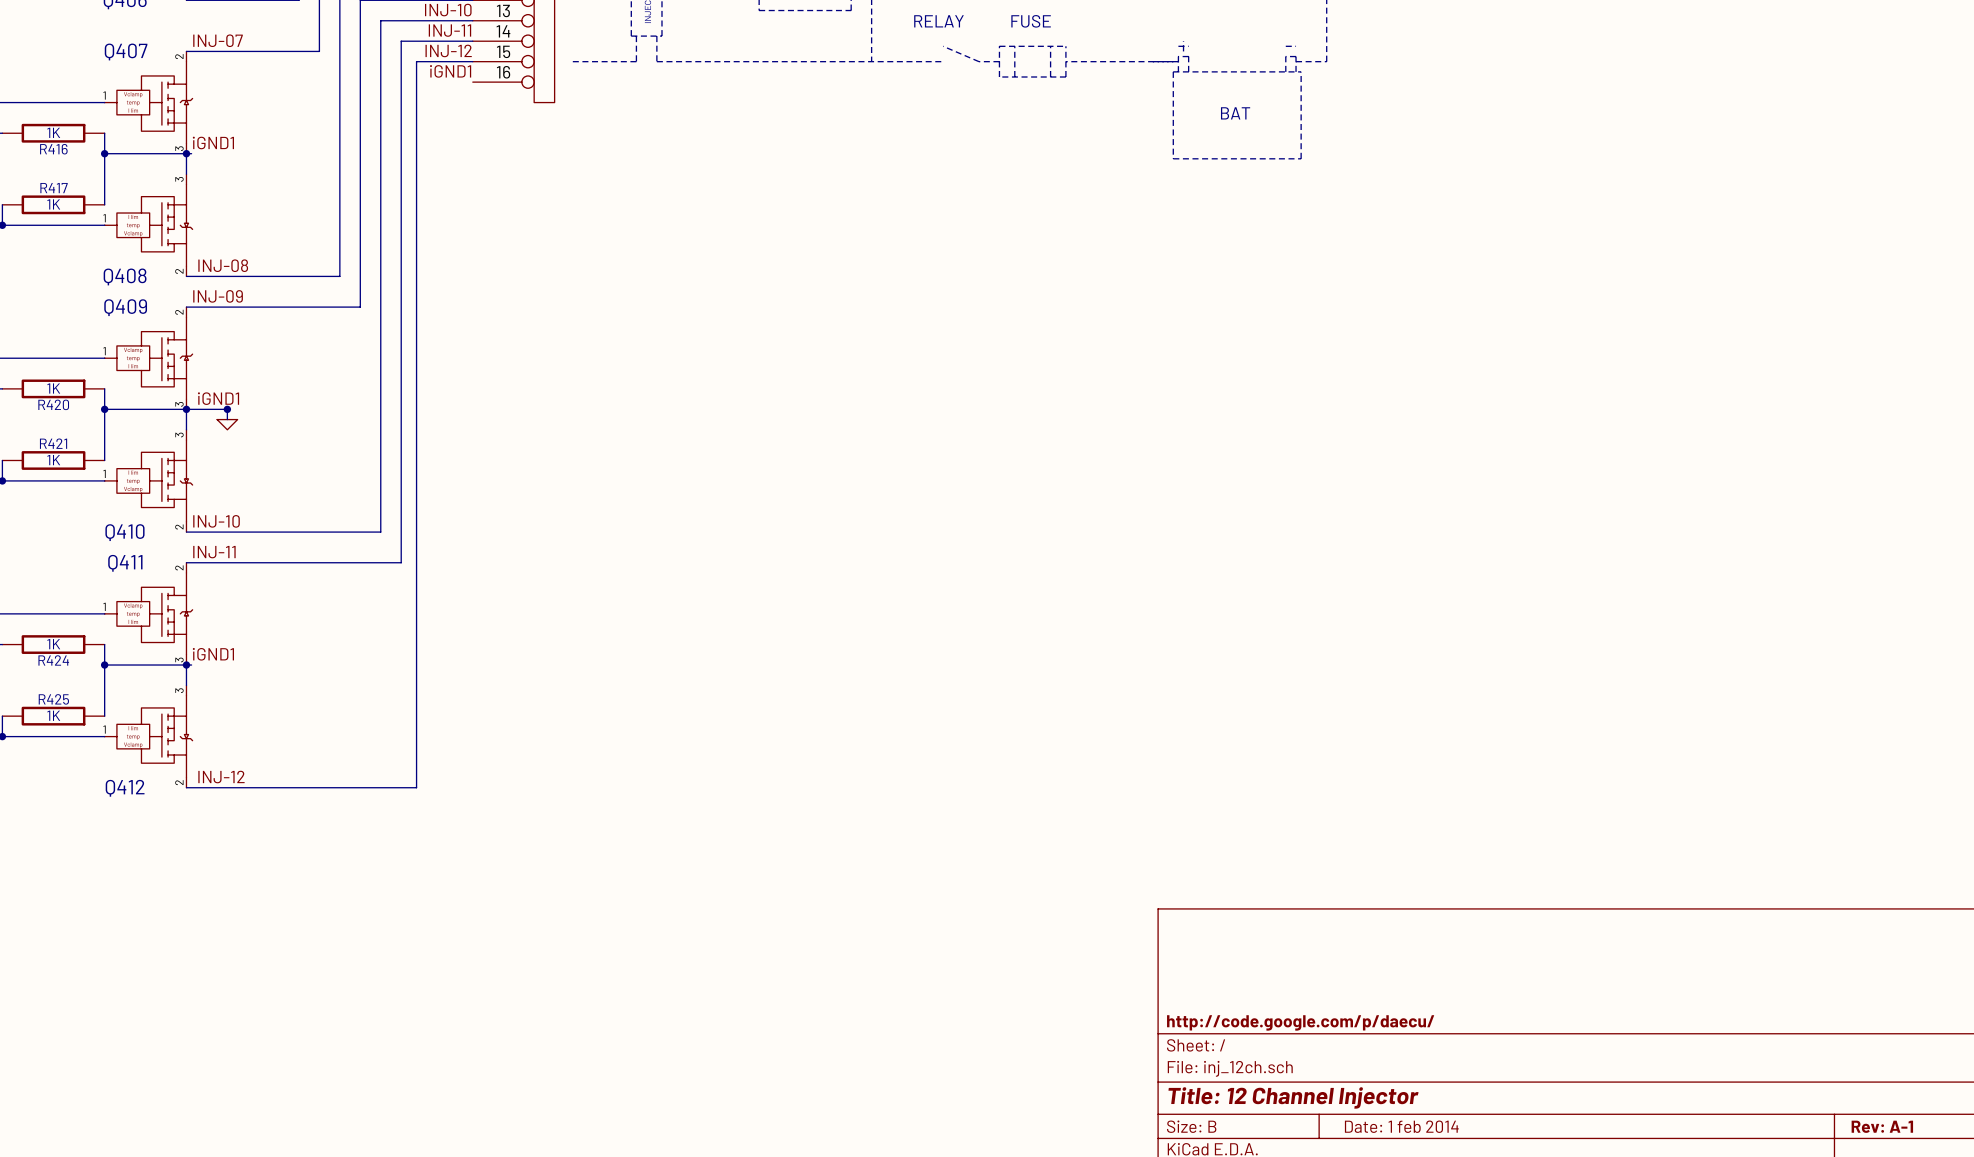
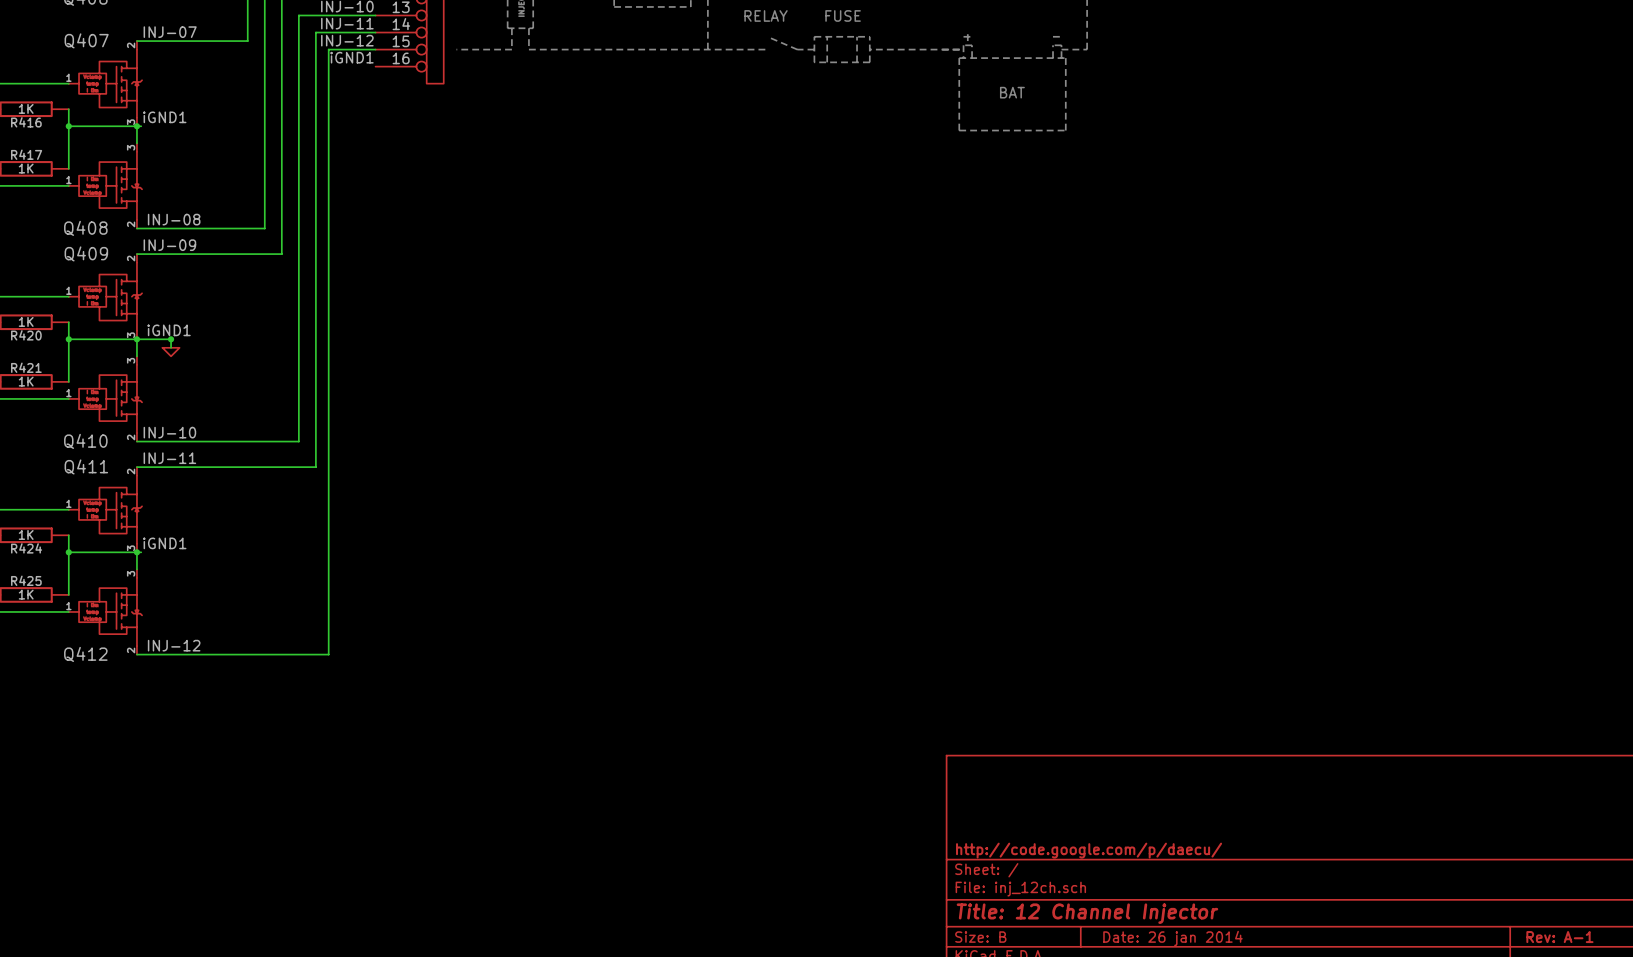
title block: Date: 1 feb 2014 (1401, 1126) -> Date: 26 jan 2014 (1172, 938)

